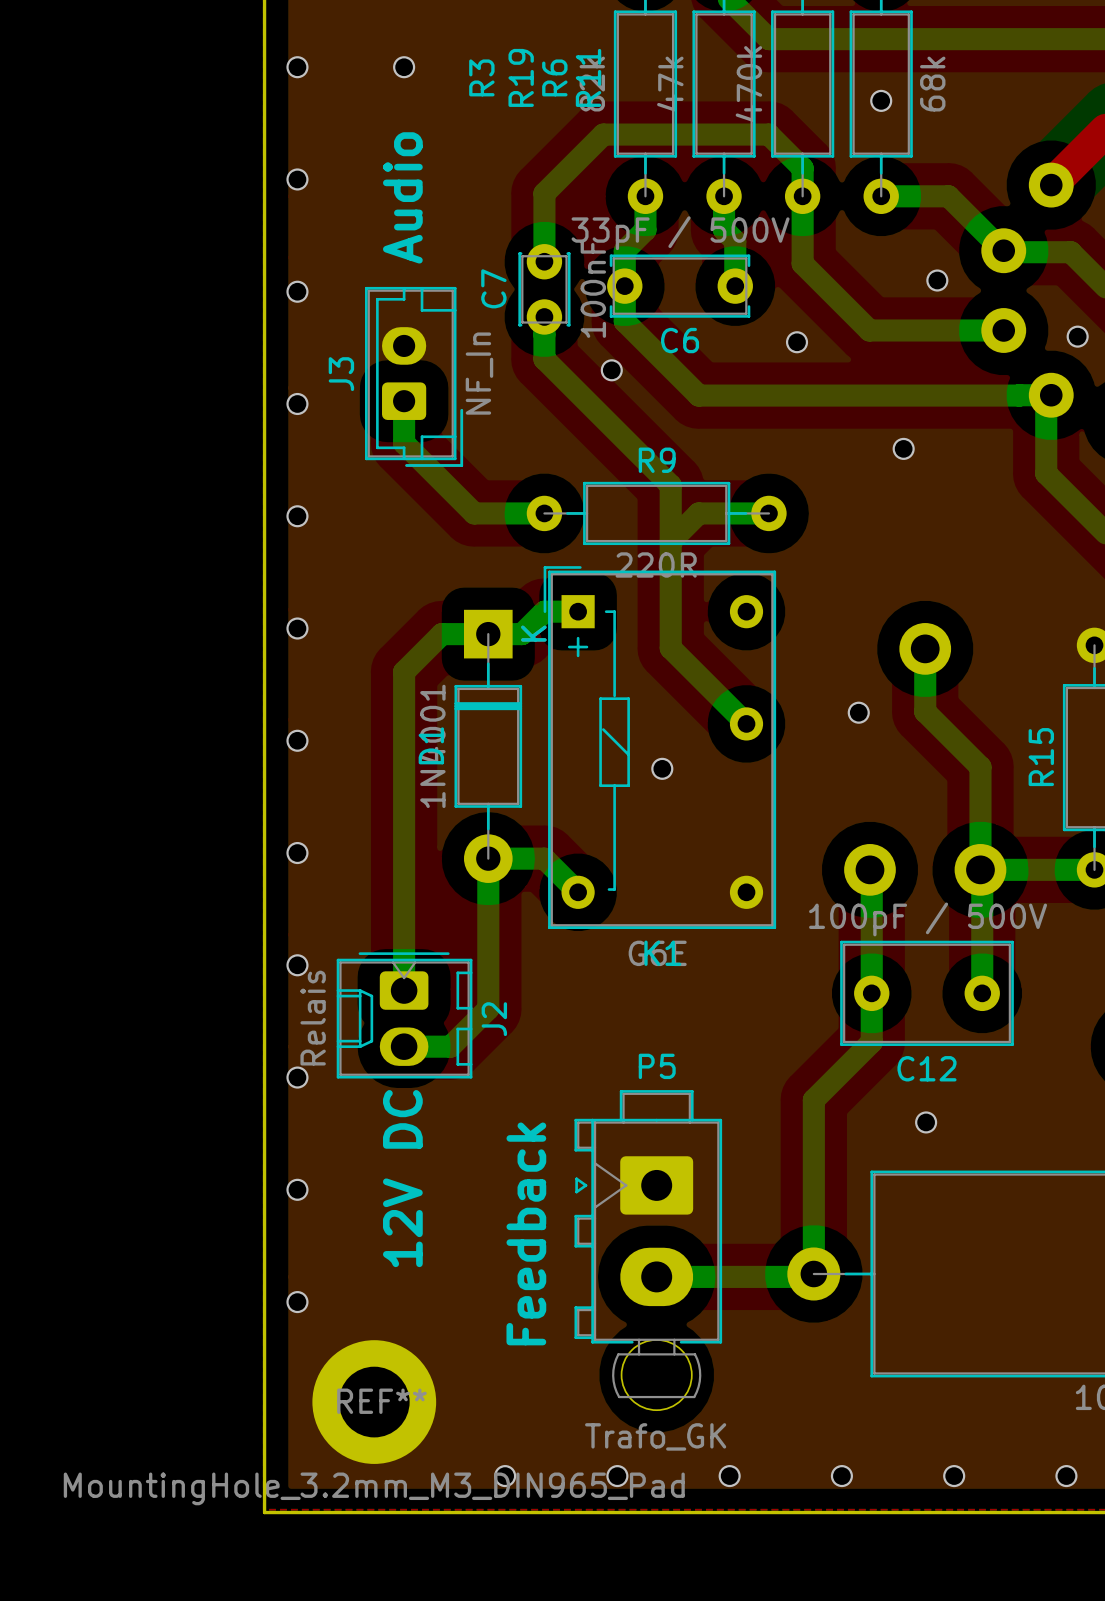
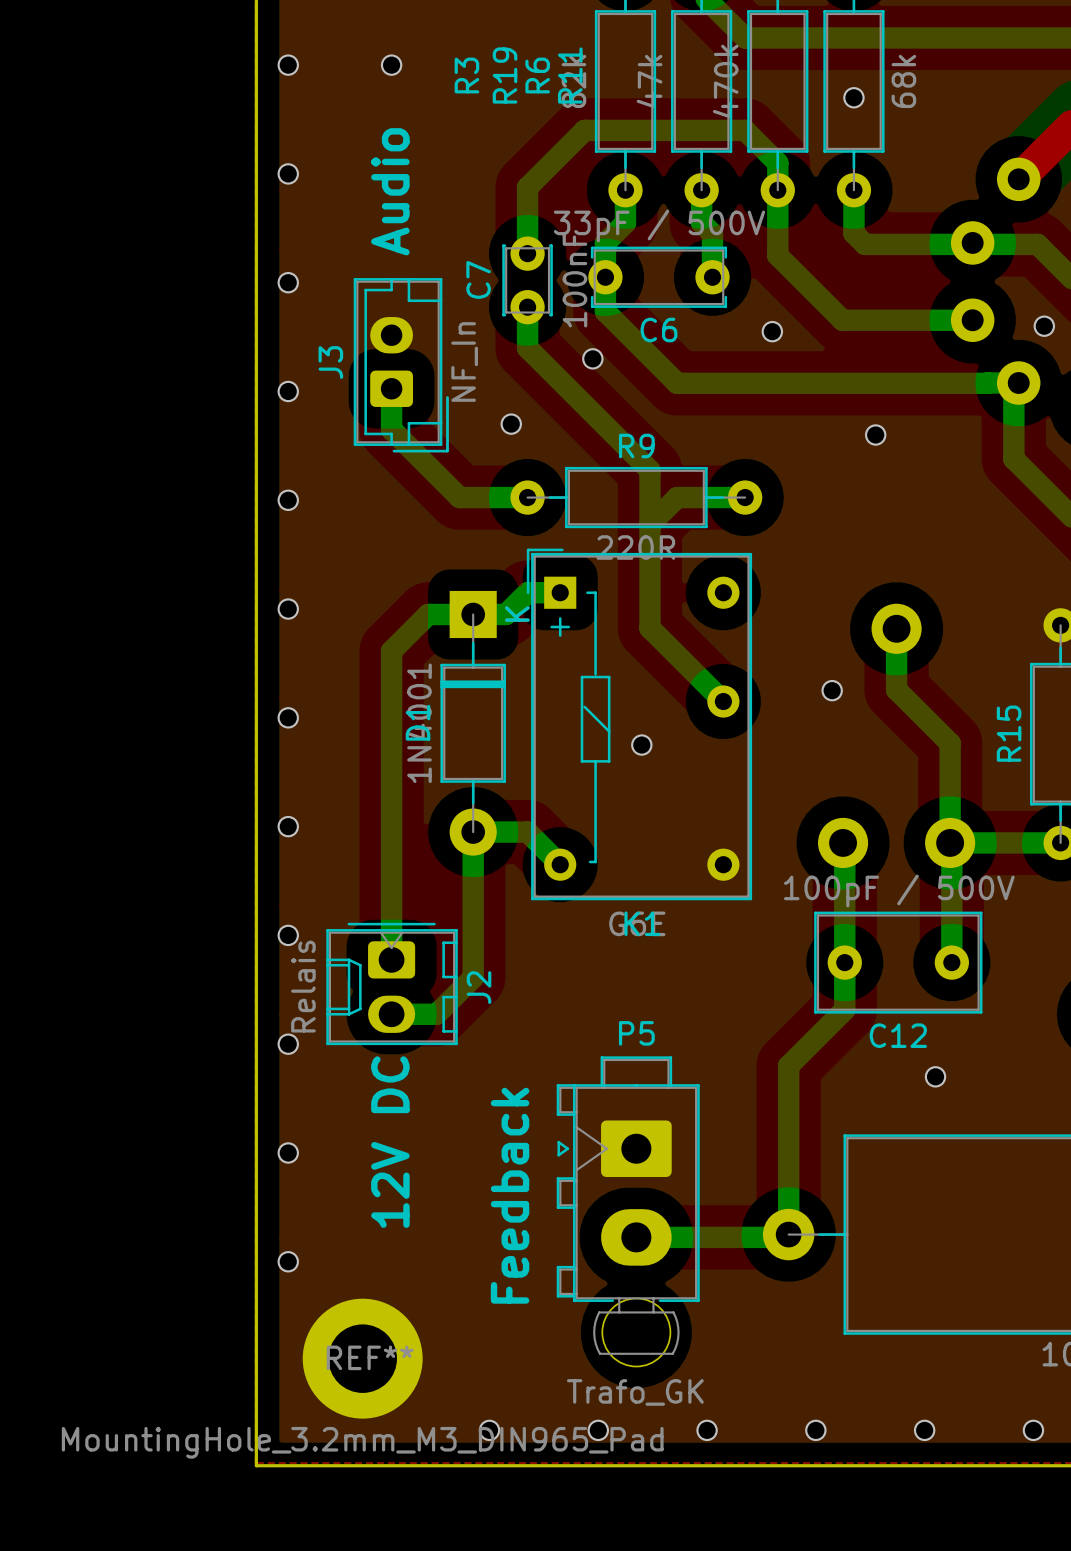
bottom track: (881, 196) (948, 196) (1004, 252) -> (853, 190) (853, 233) (865, 244) (973, 244)
via: (937, 280) -> none
via: none -> (511, 424)
via position: (926, 1122) -> (935, 1076)

